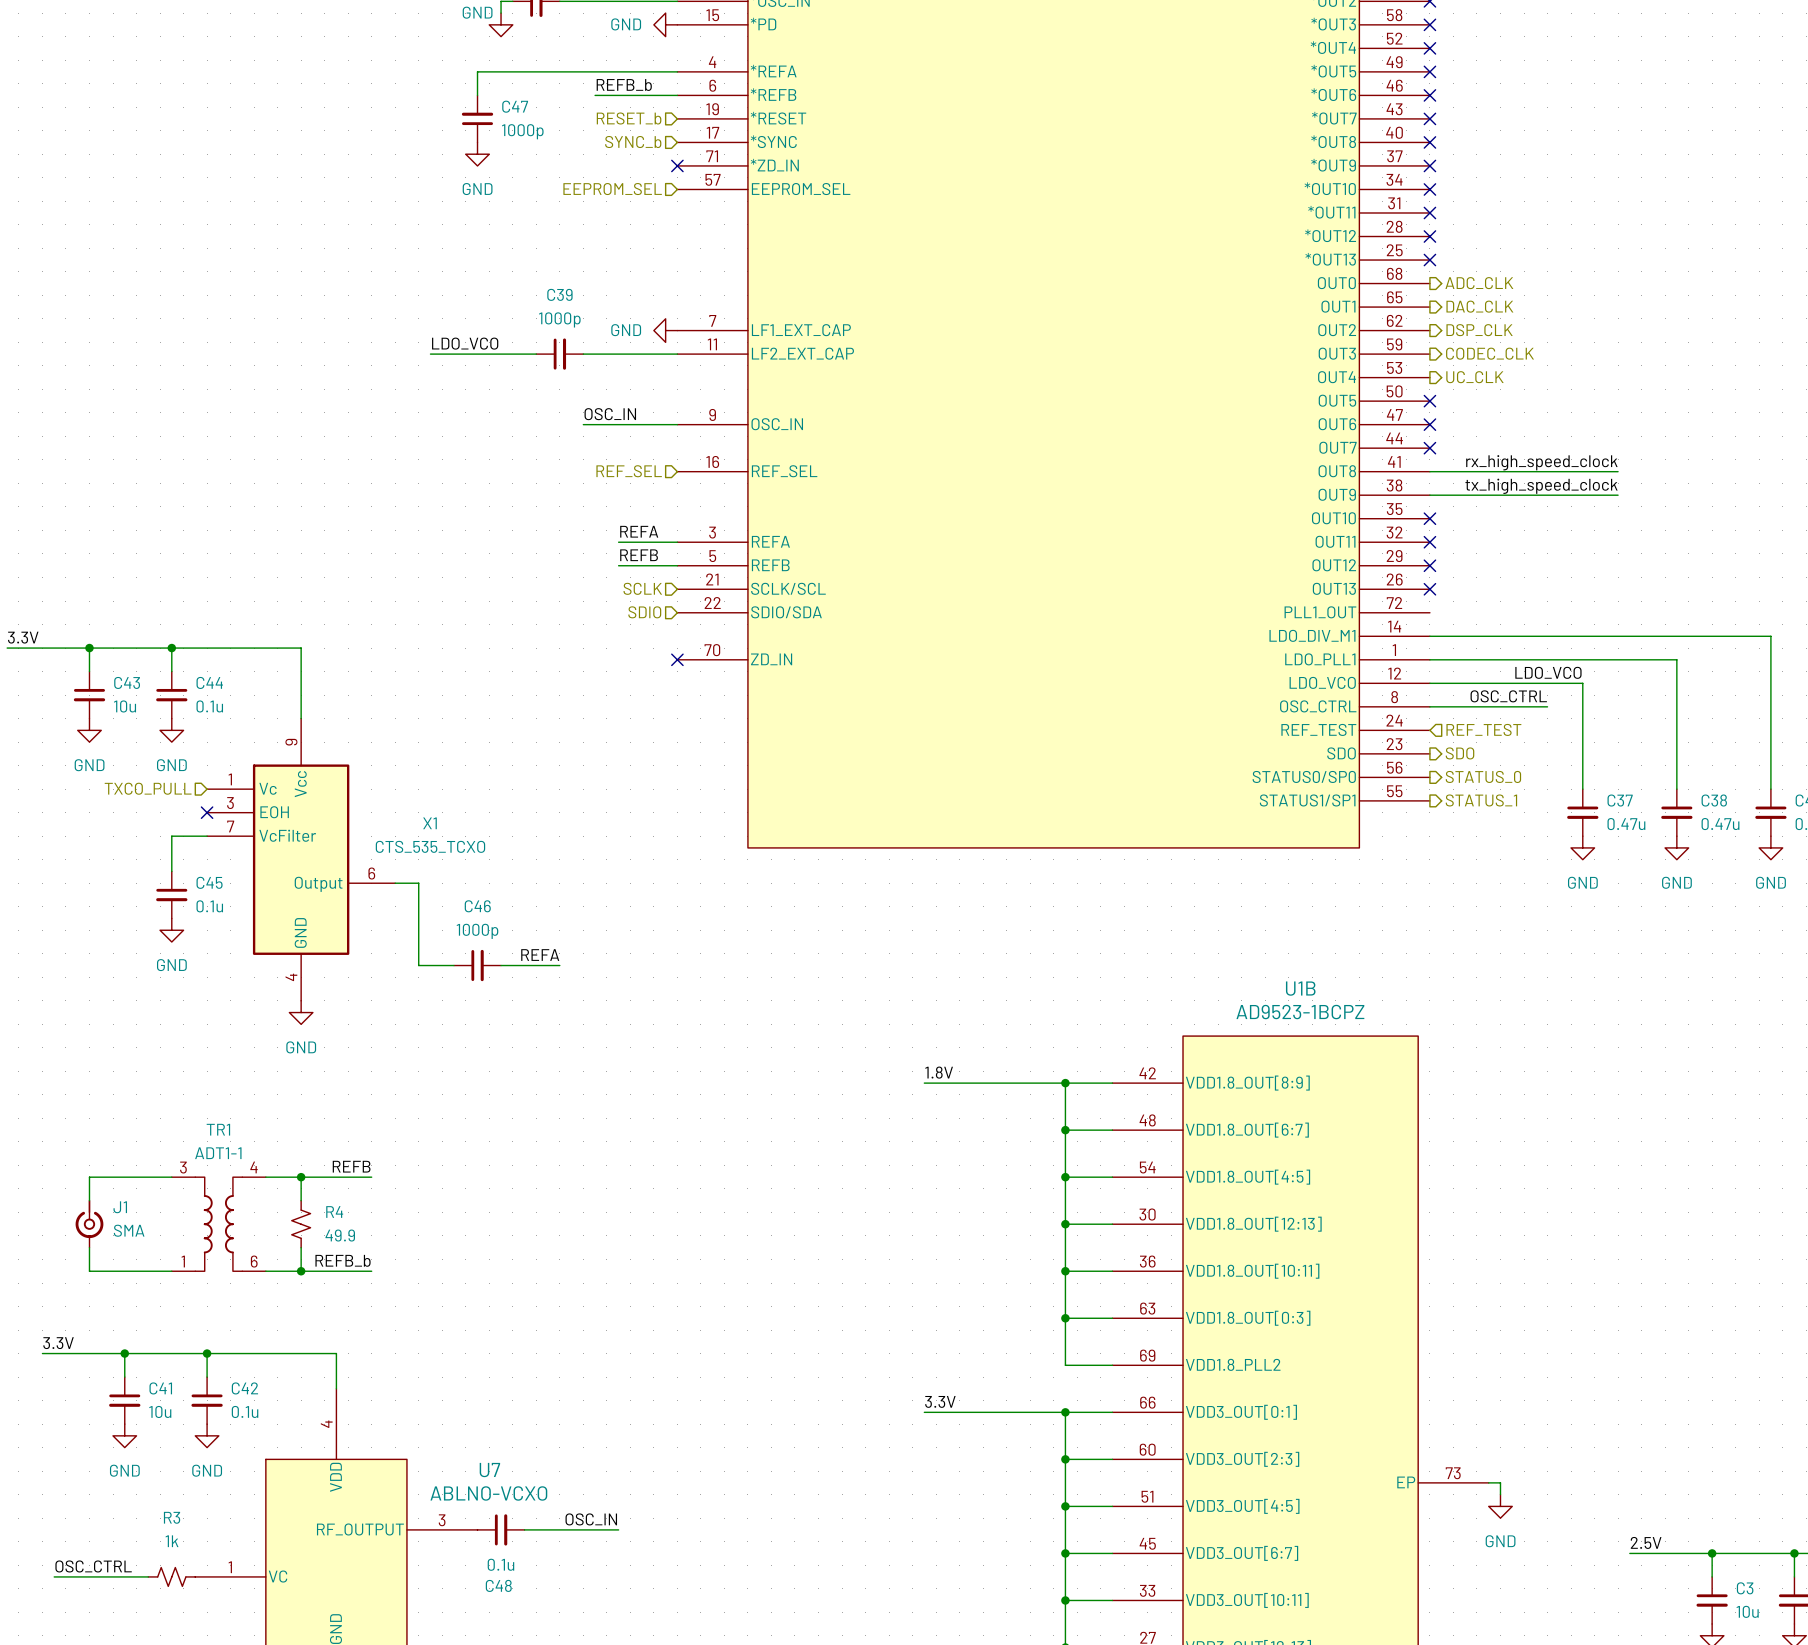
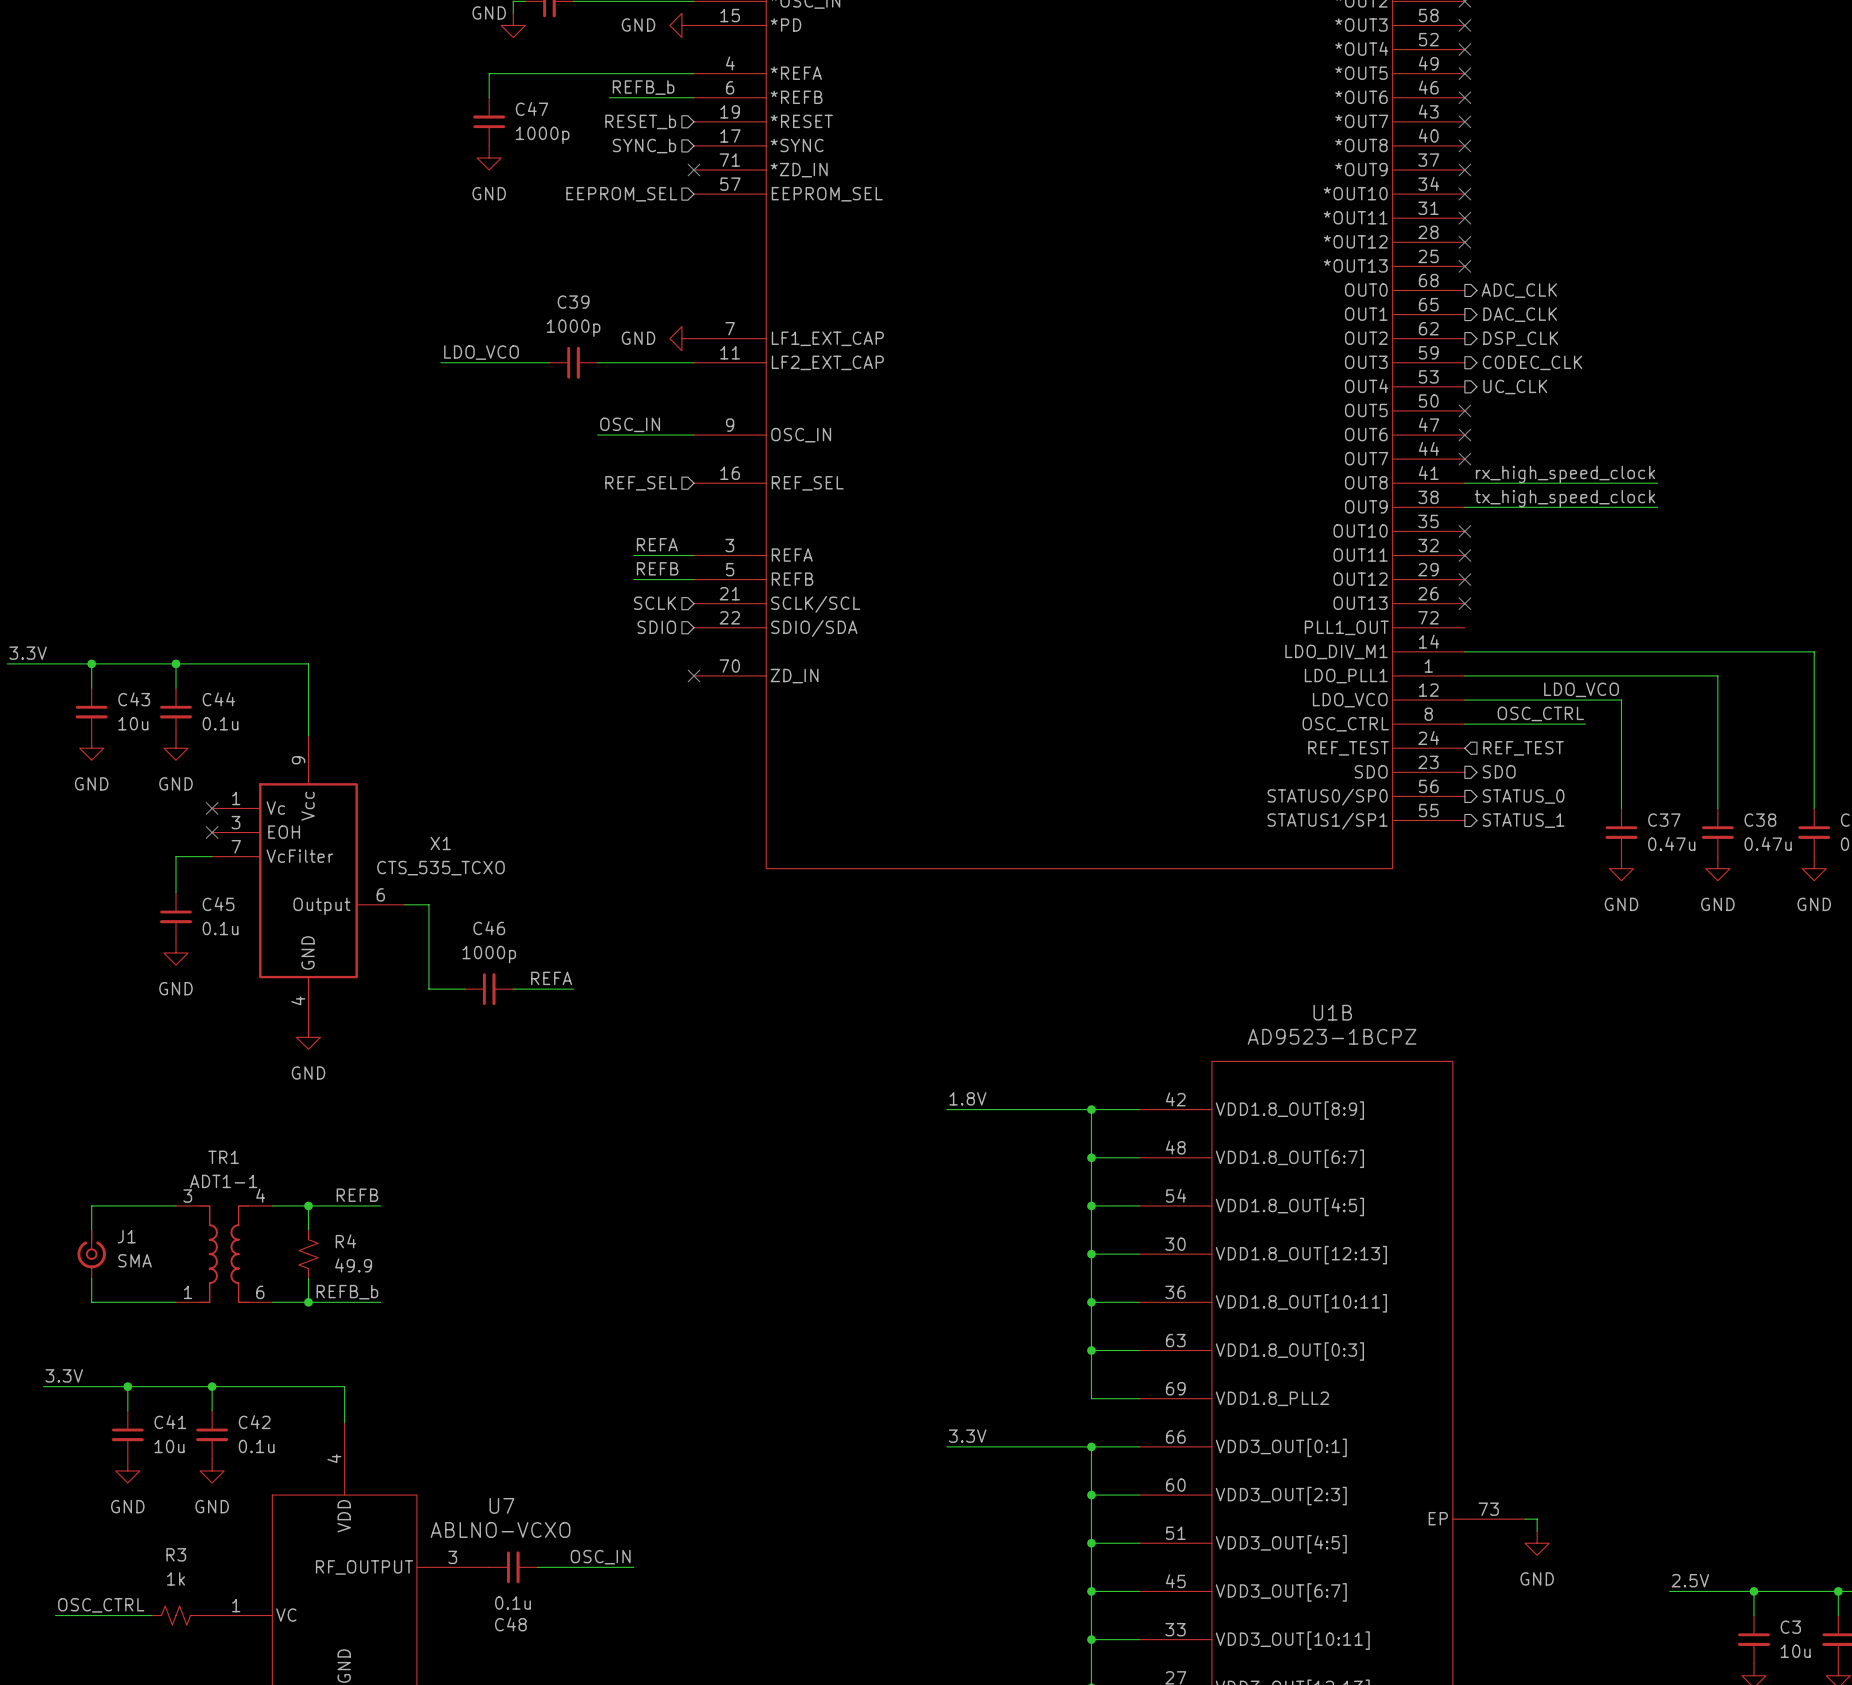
hierarchical label: TXCO_PULL (148, 788) -> none
no-connect mark: none -> (212, 808)

